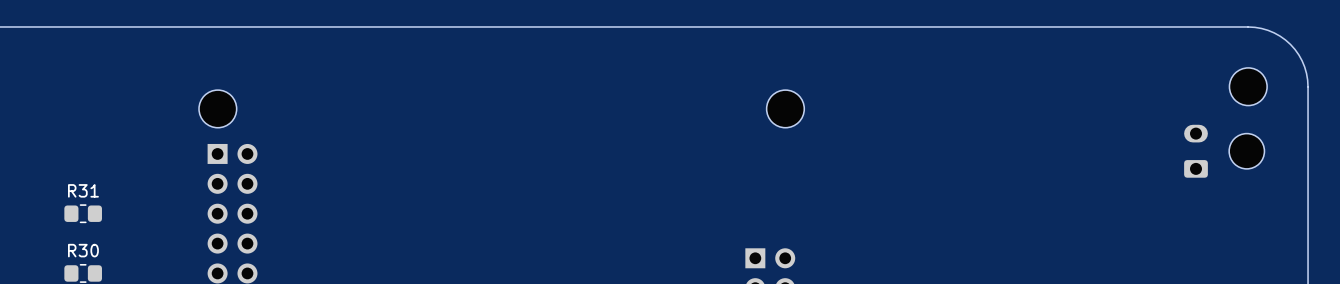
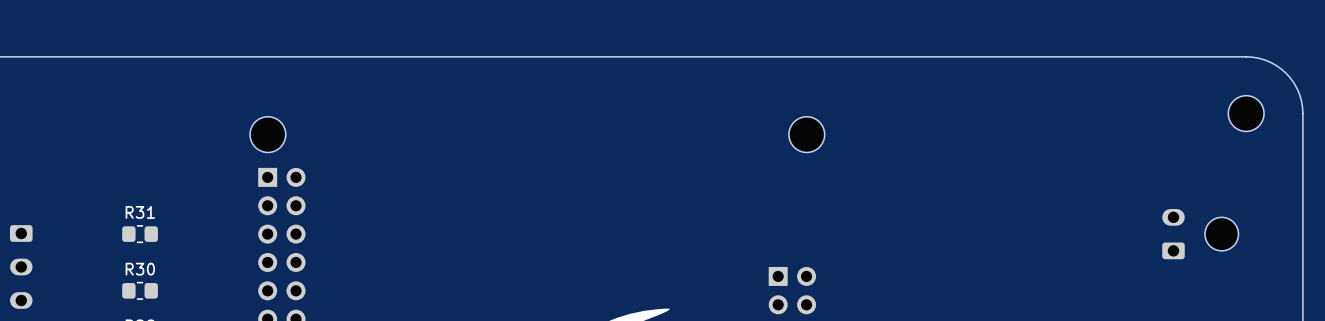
part position: (1224, 151) -> (1200, 234)

